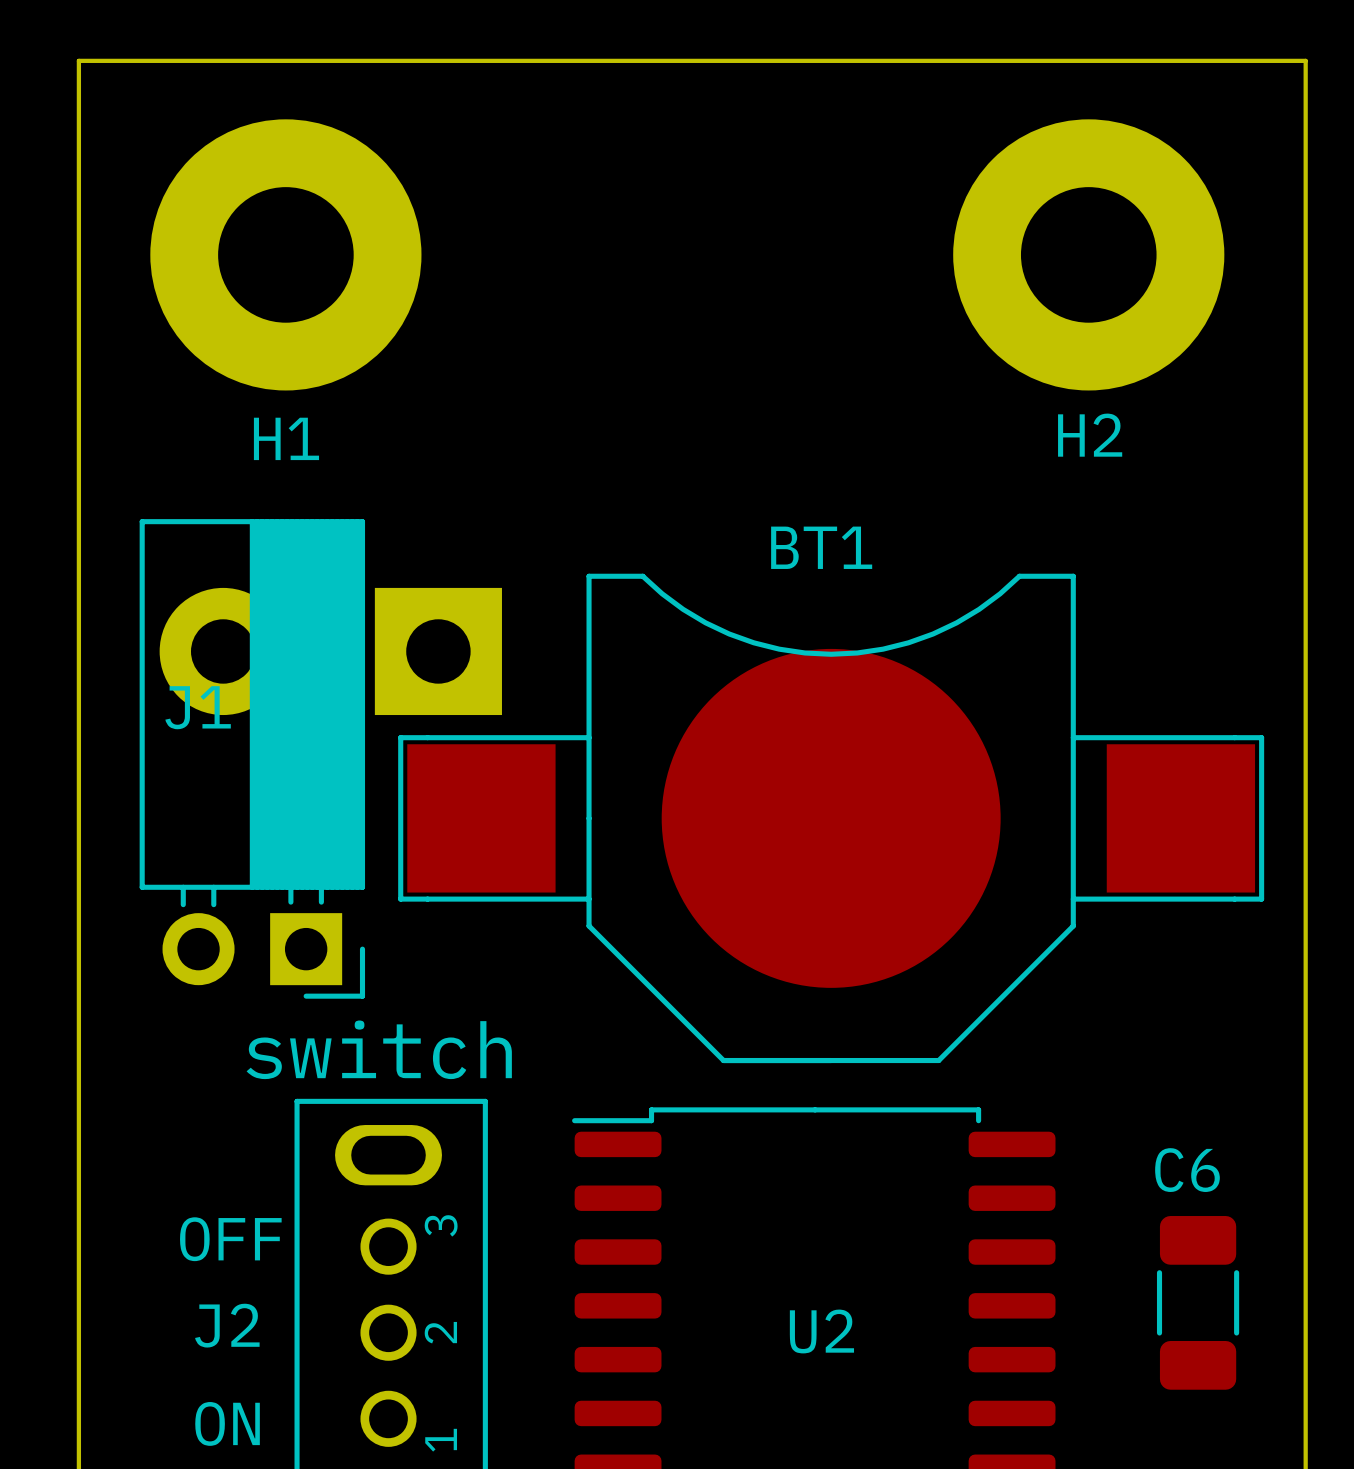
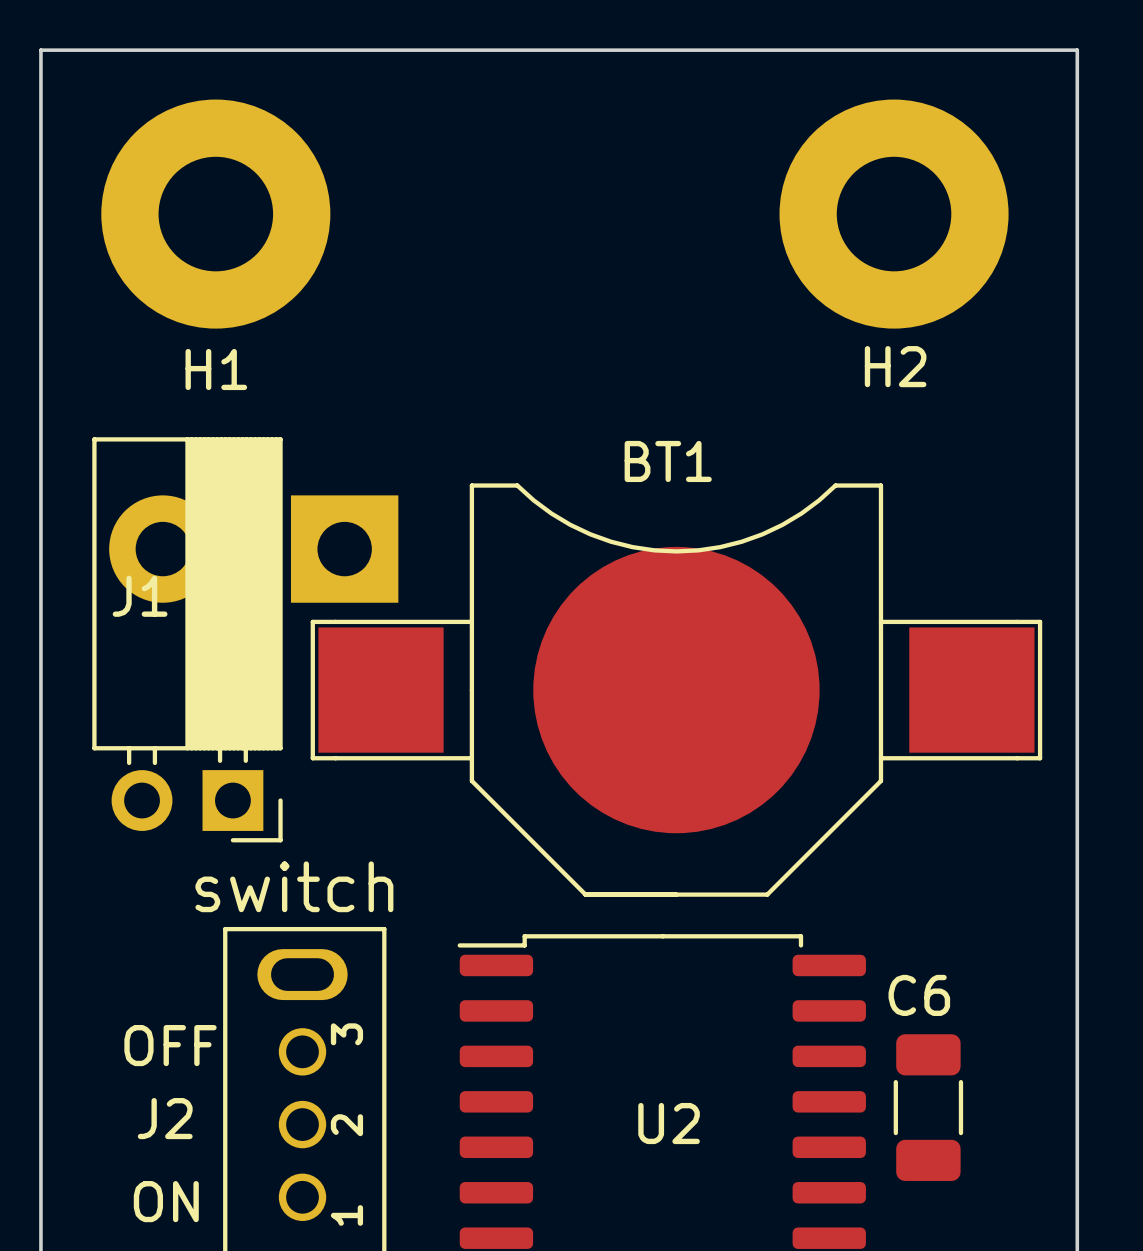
C6 position: (1198, 1302) -> (928, 1107)

